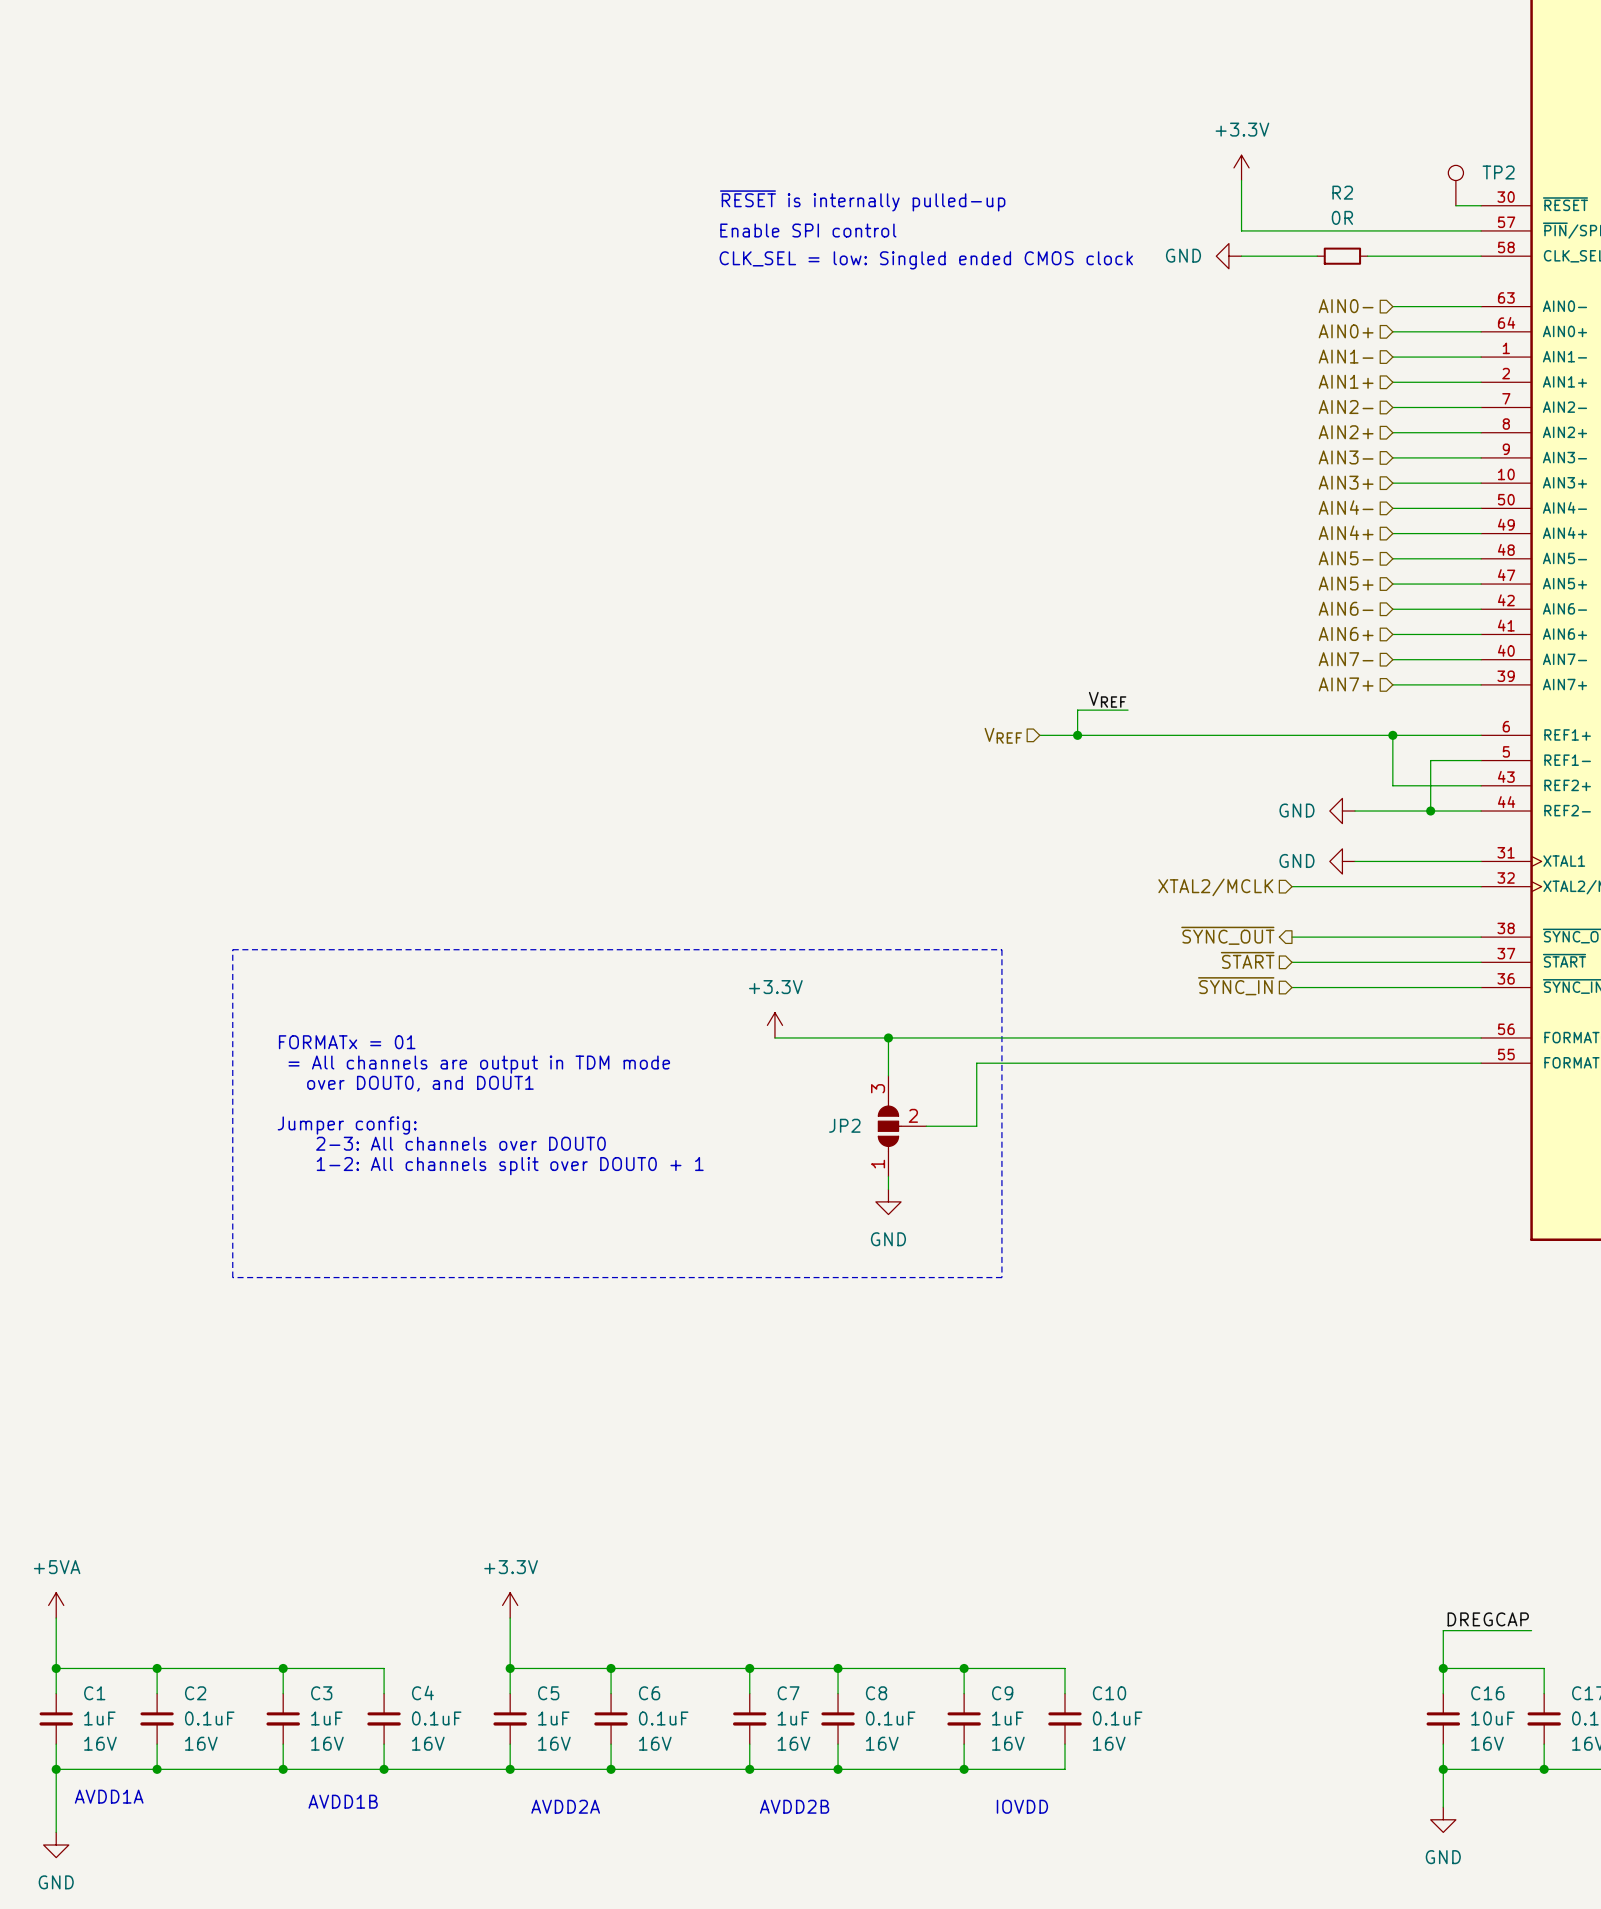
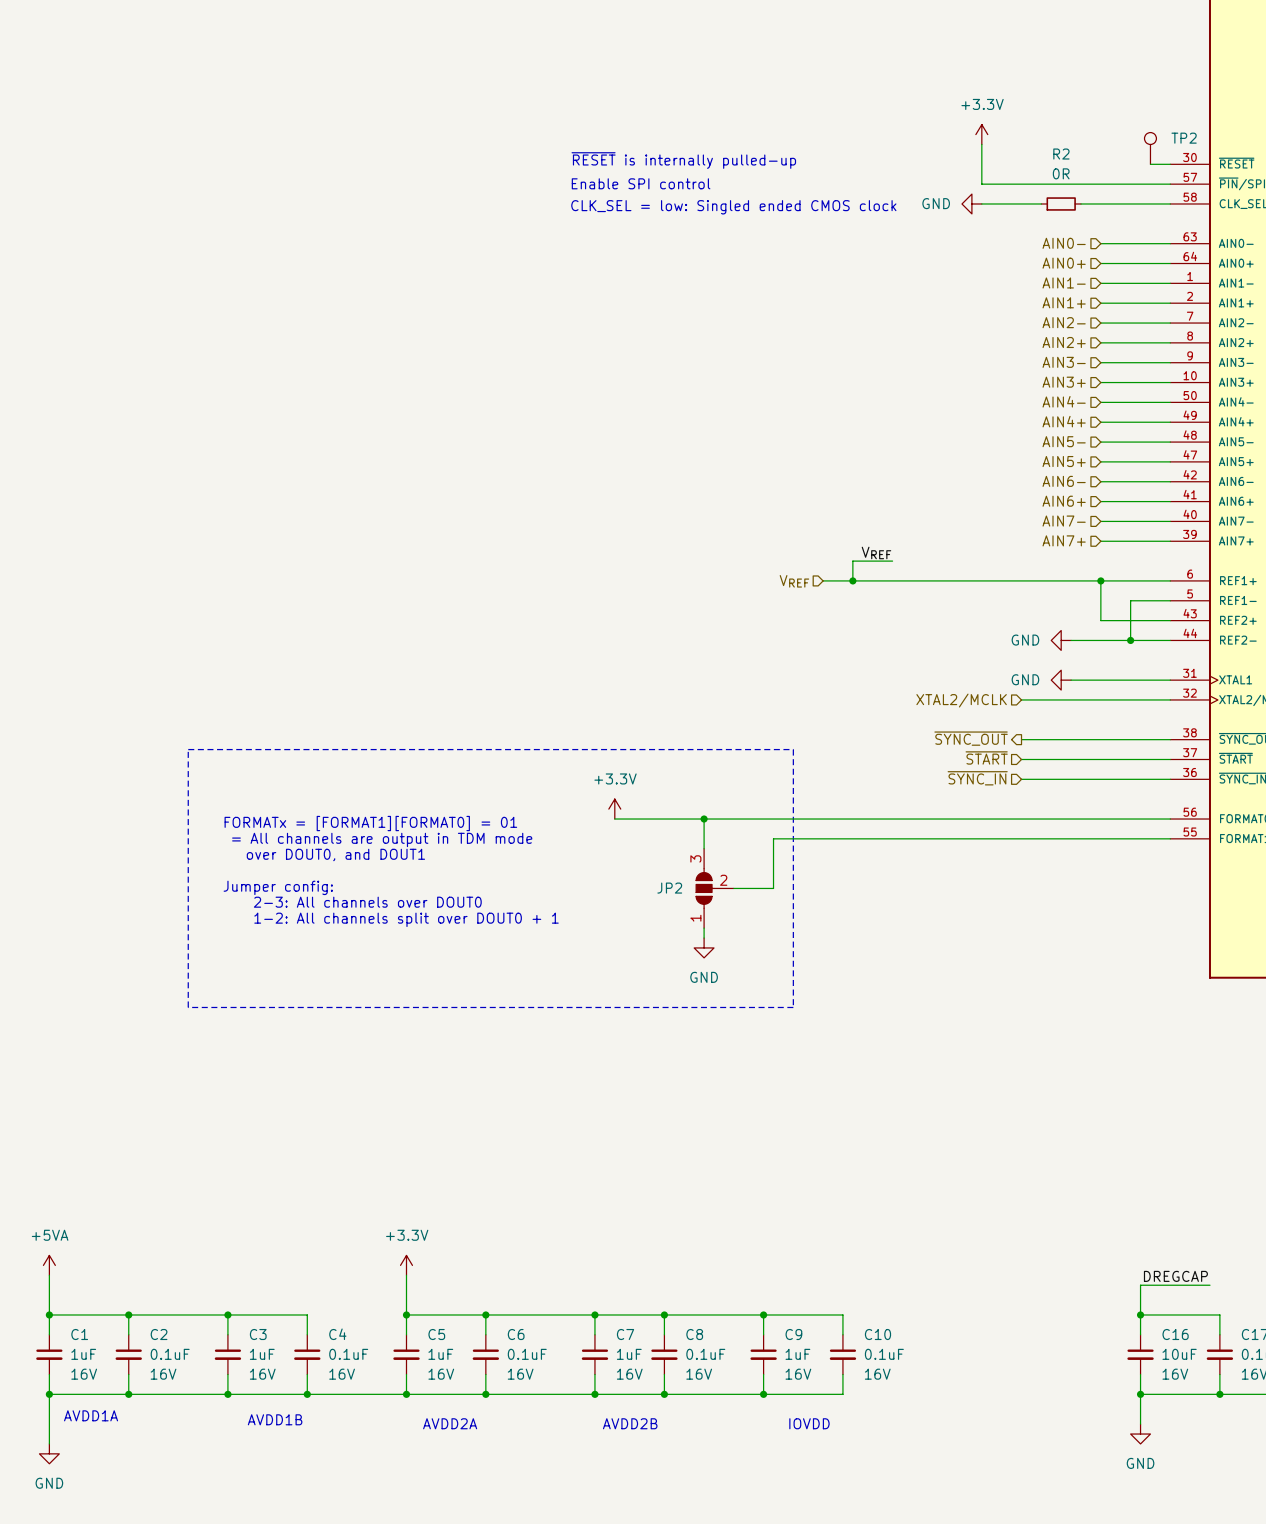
text: FORMATx = 01 (347, 1042) -> FORMATx = [FORMAT1][FORMAT0] = 01 (370, 823)

